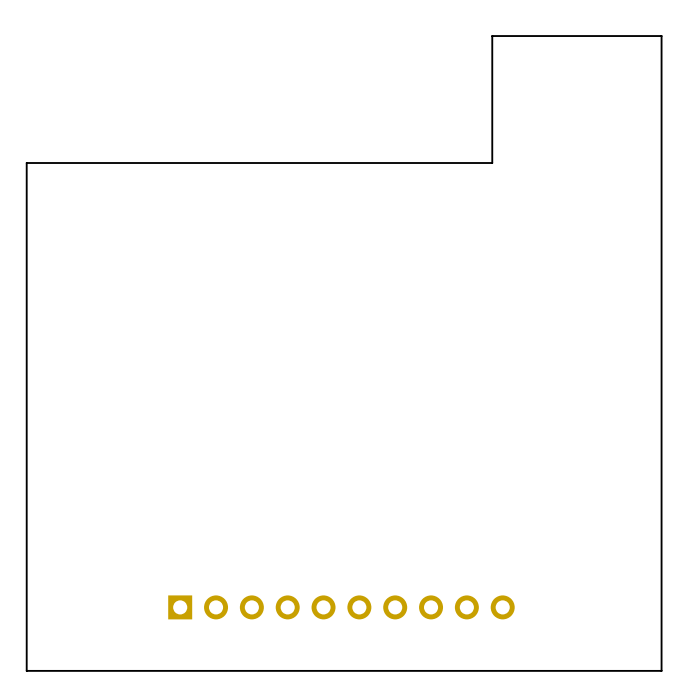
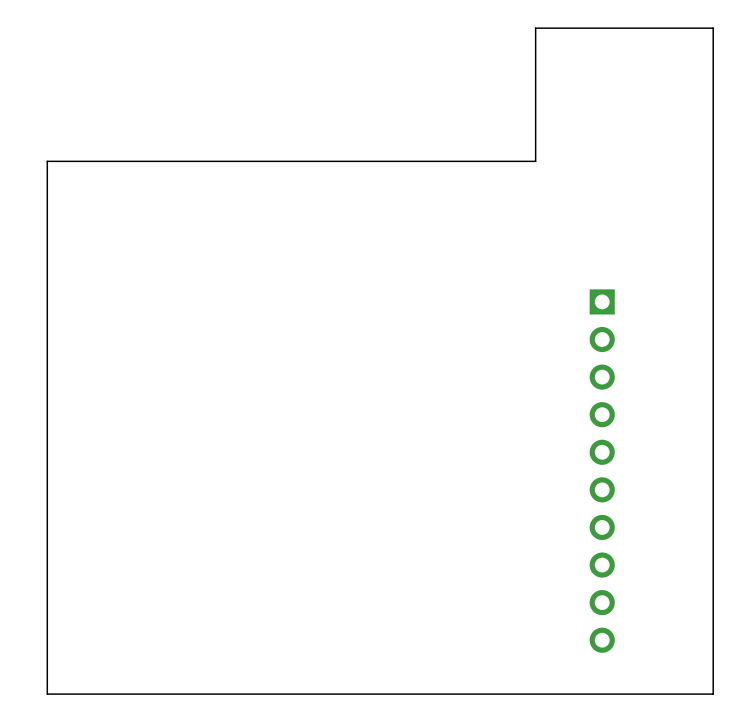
part rotation: 0° (341, 607) -> 90° clockwise (602, 471)
part position: (341, 607) -> (602, 471)

